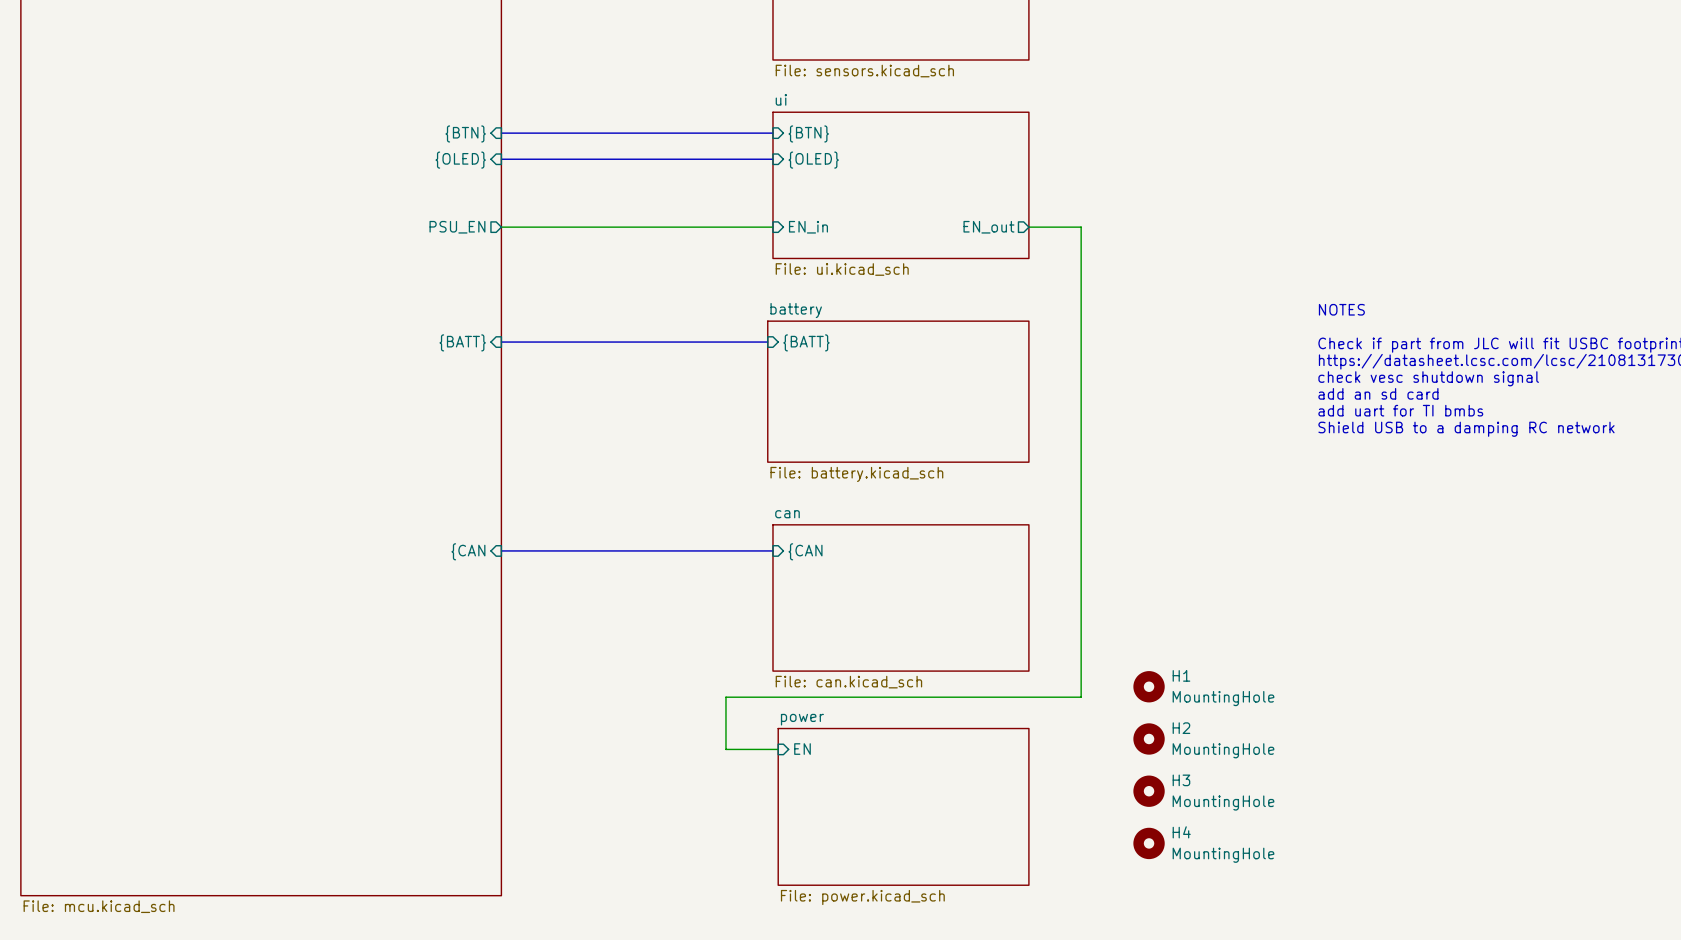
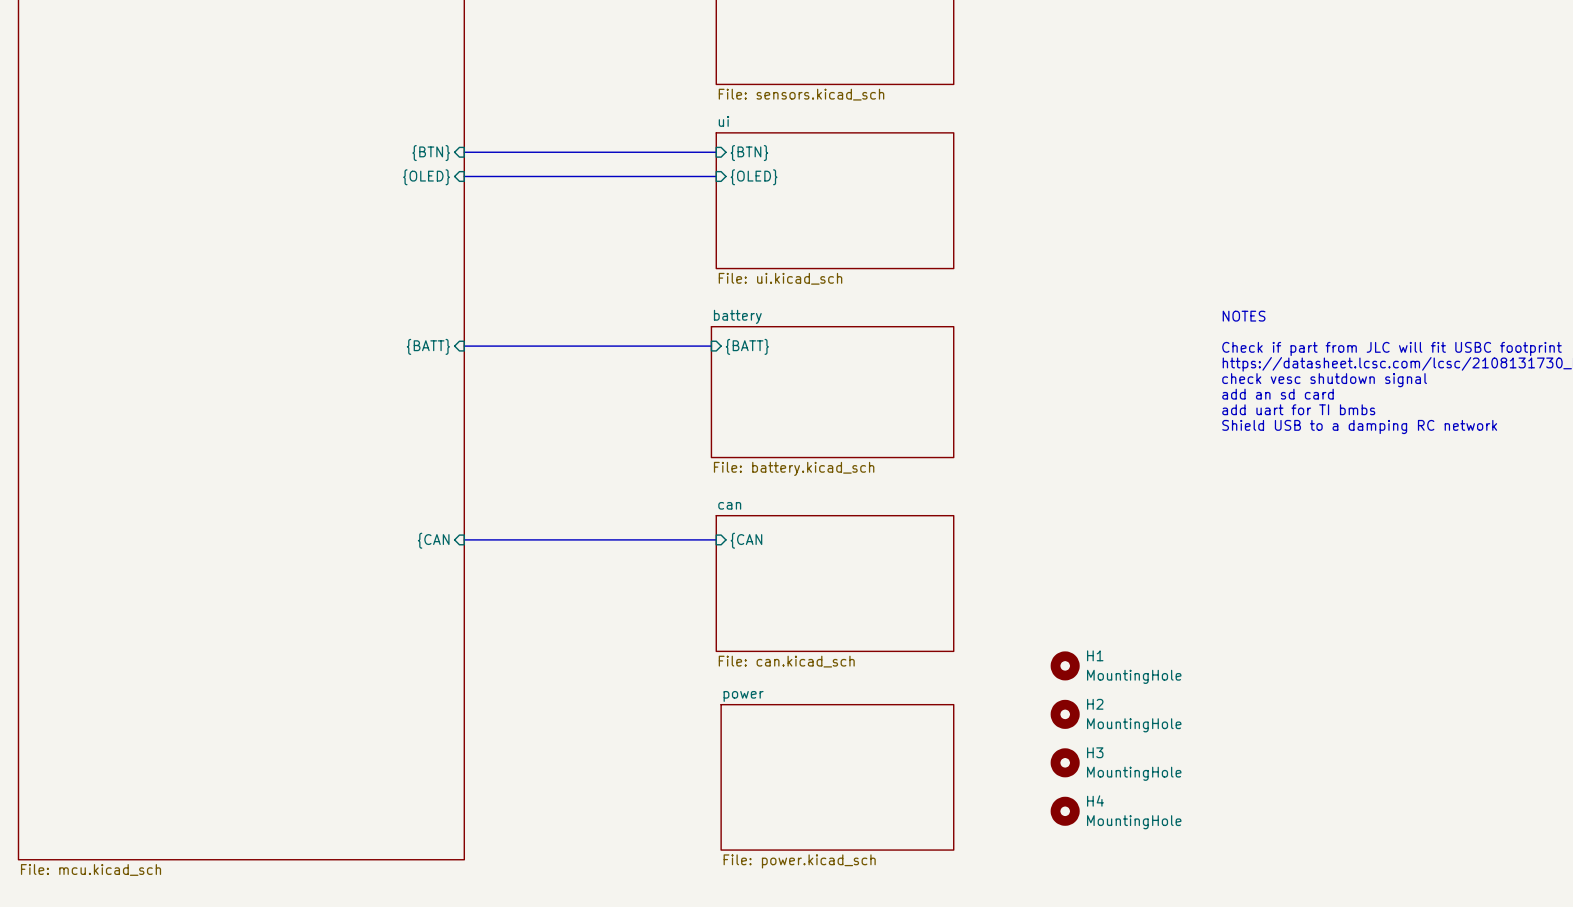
sheet pin: PSU_EN (457, 227) -> none
wire: (501, 227) (772, 227) -> none
sheet pin: EN_in (808, 227) -> none
sheet pin: EN_out (988, 227) -> none
wire: (1028, 227) (1081, 227) (1081, 697) (725, 697) (725, 749) (778, 749) -> none
sheet pin: EN (802, 749) -> none

